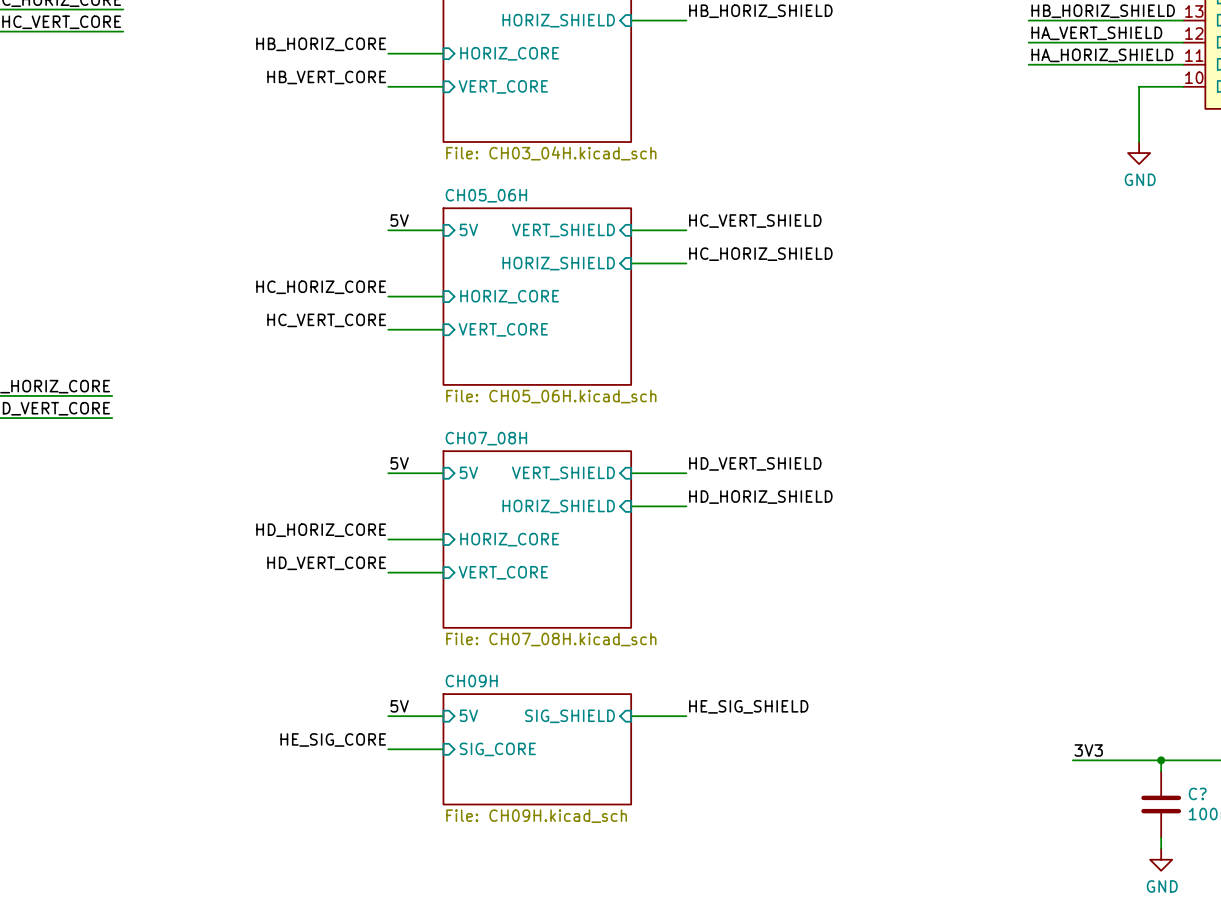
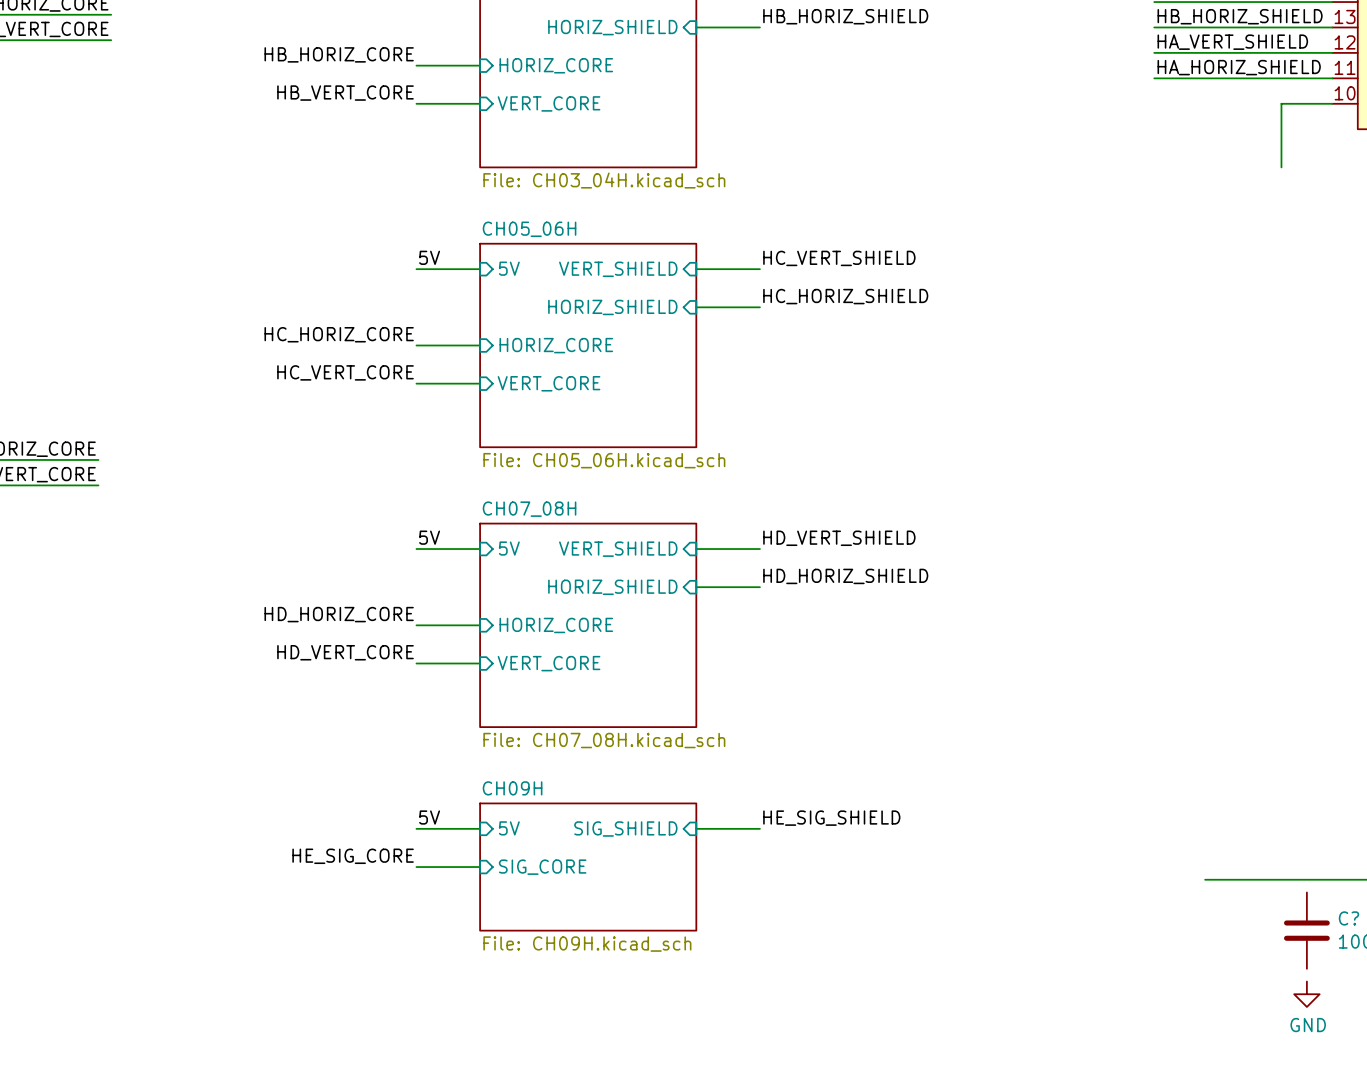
power symbol: GND (1139, 153) -> none
label: 3V3 (1088, 750) -> none
wire: (1161, 760) (1161, 771) -> none
junction: (1161, 760) -> none
wire: (1161, 837) (1161, 848) -> none

